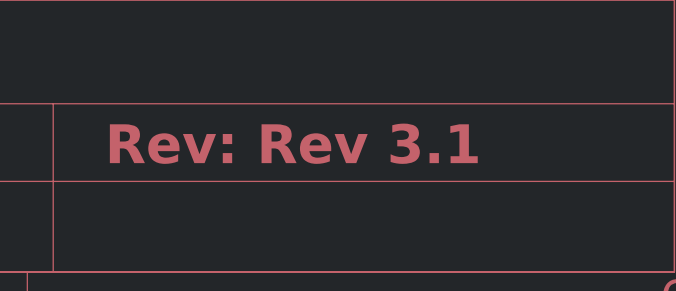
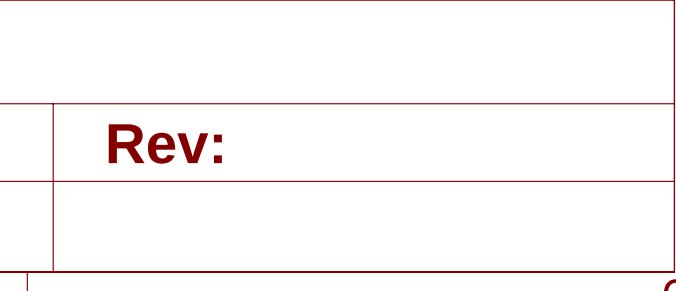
title block: Rev: Rev 3.1 (293, 143) -> Rev: (165, 143)

